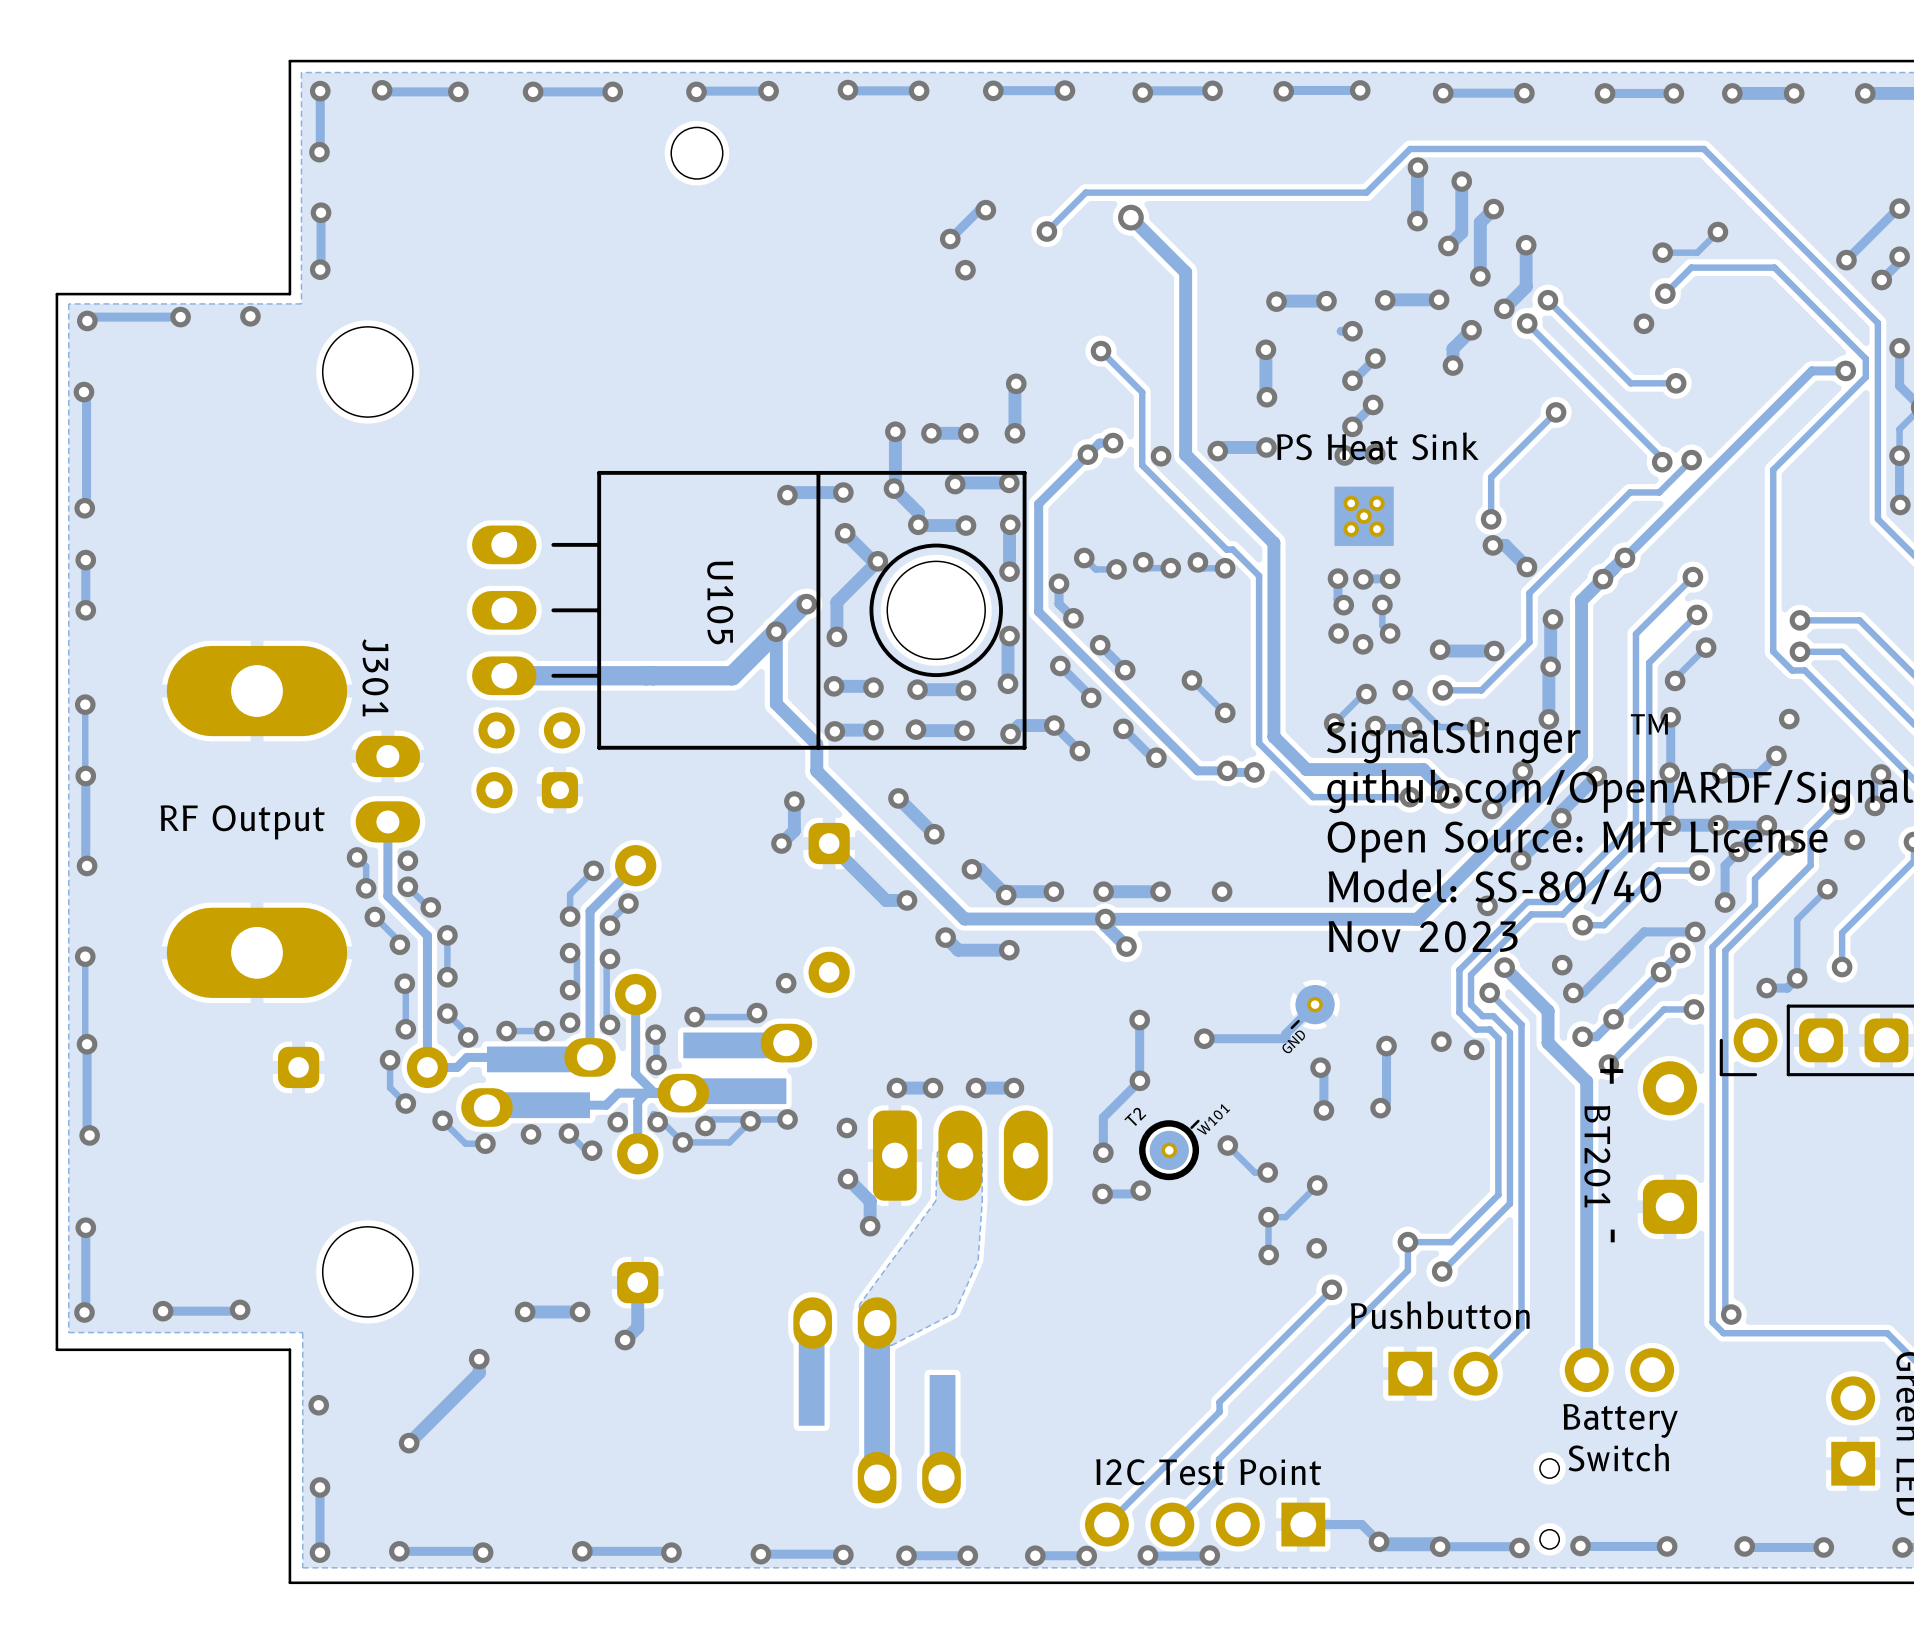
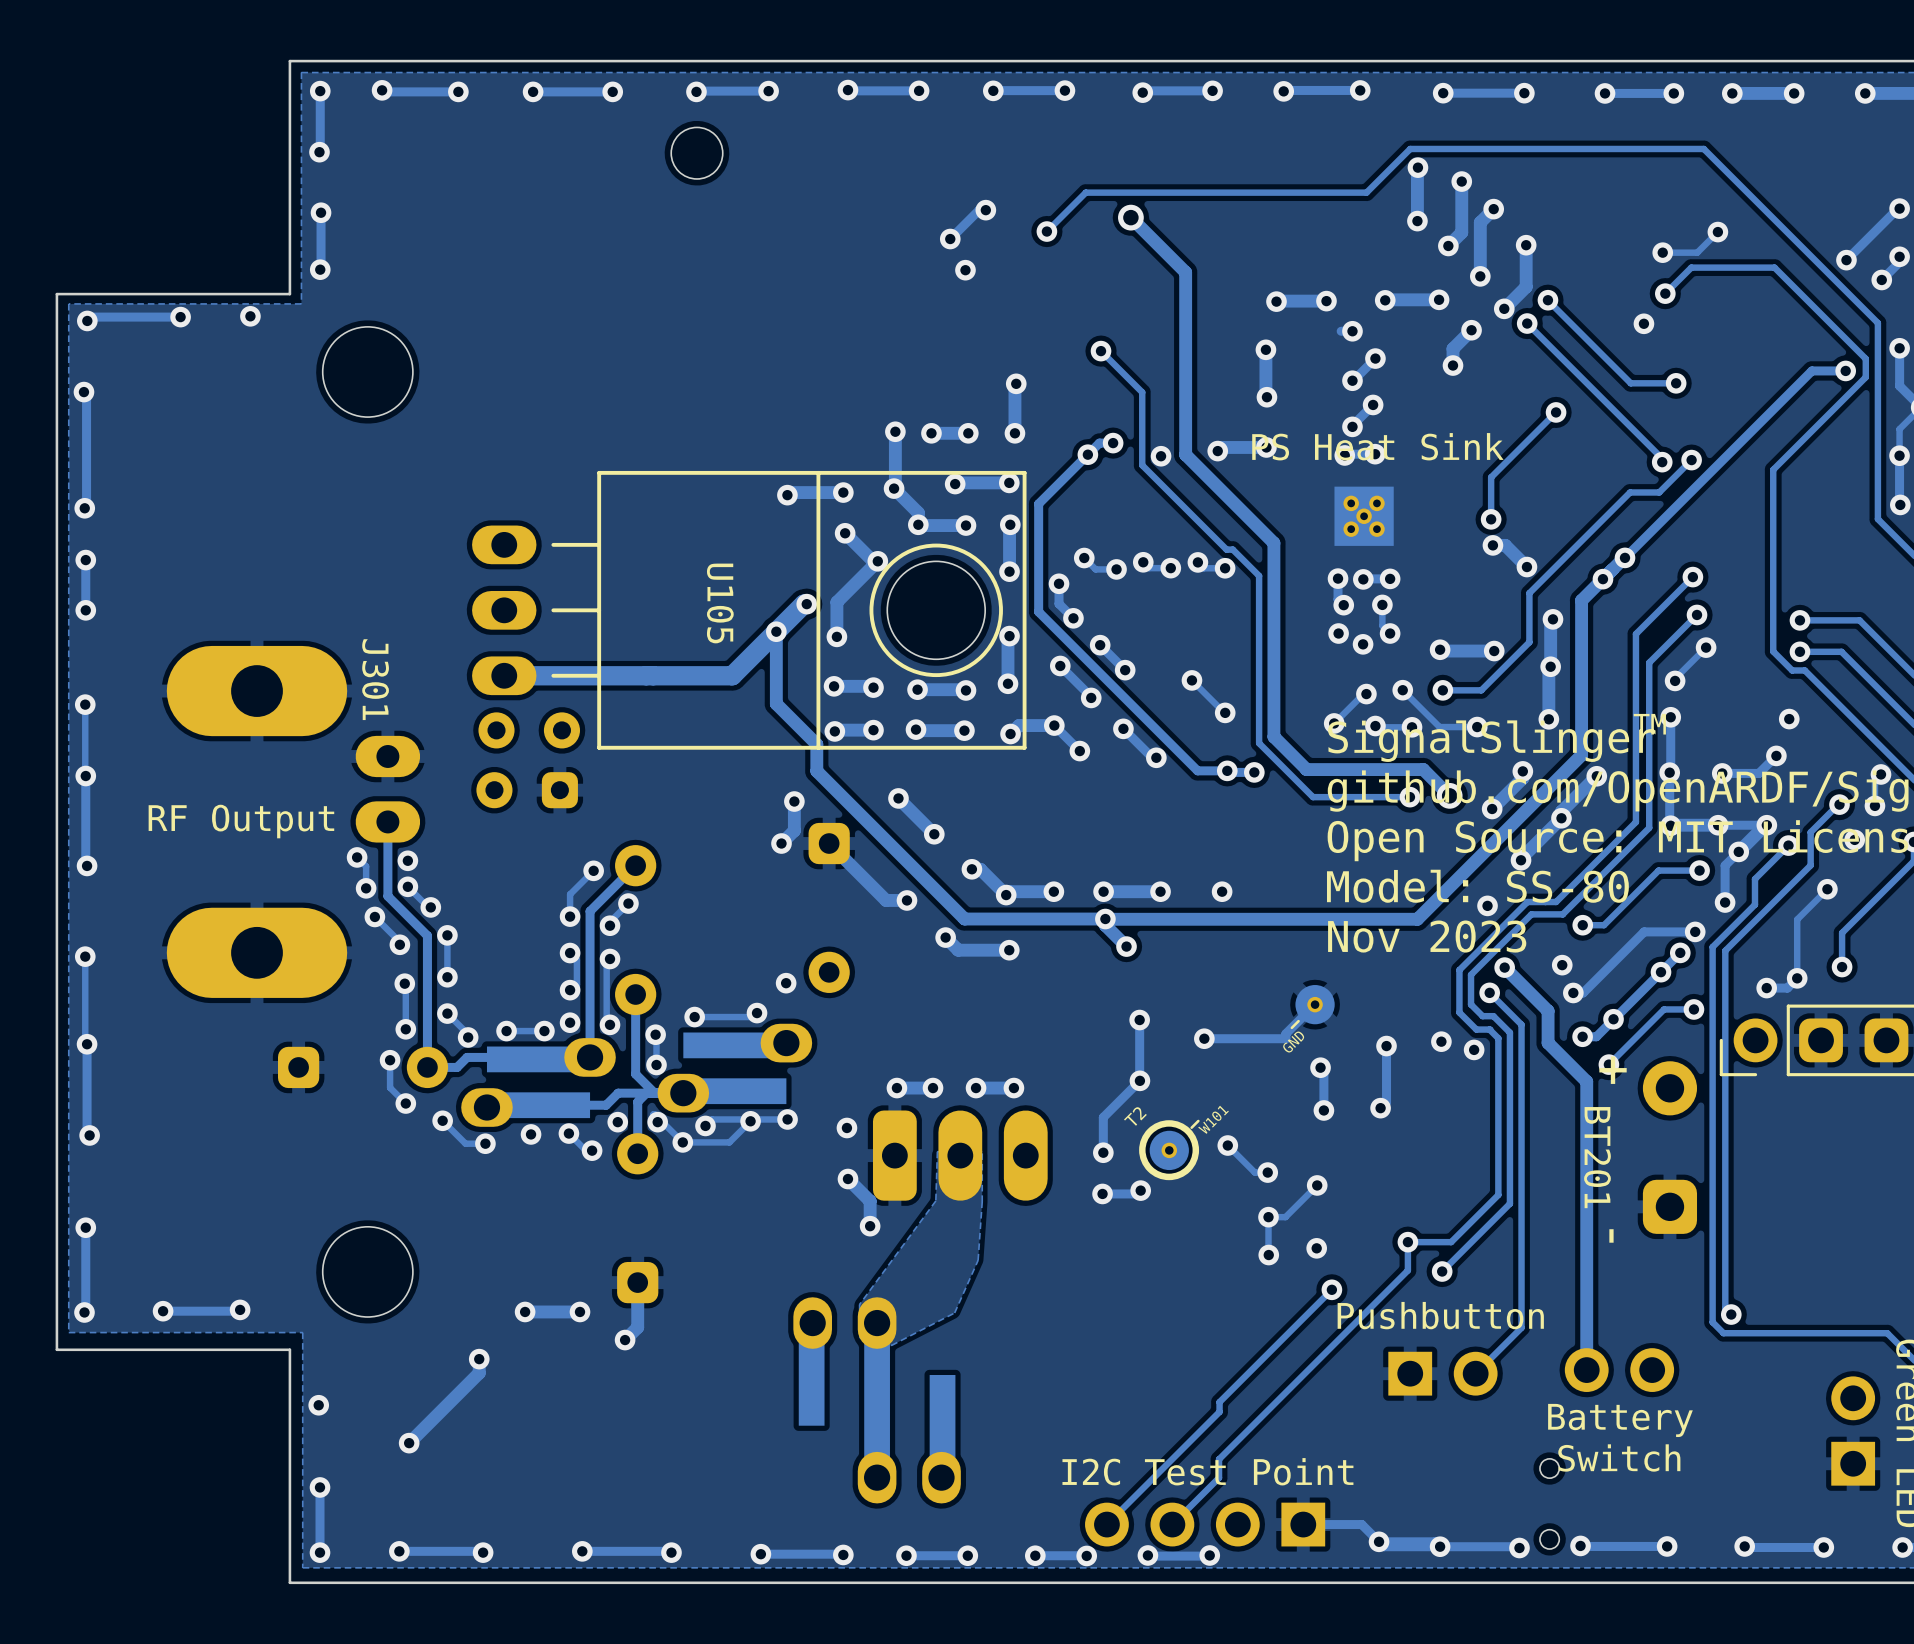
text: Model: SS-80/40 (1494, 886) -> Model: SS-80 (1477, 886)

